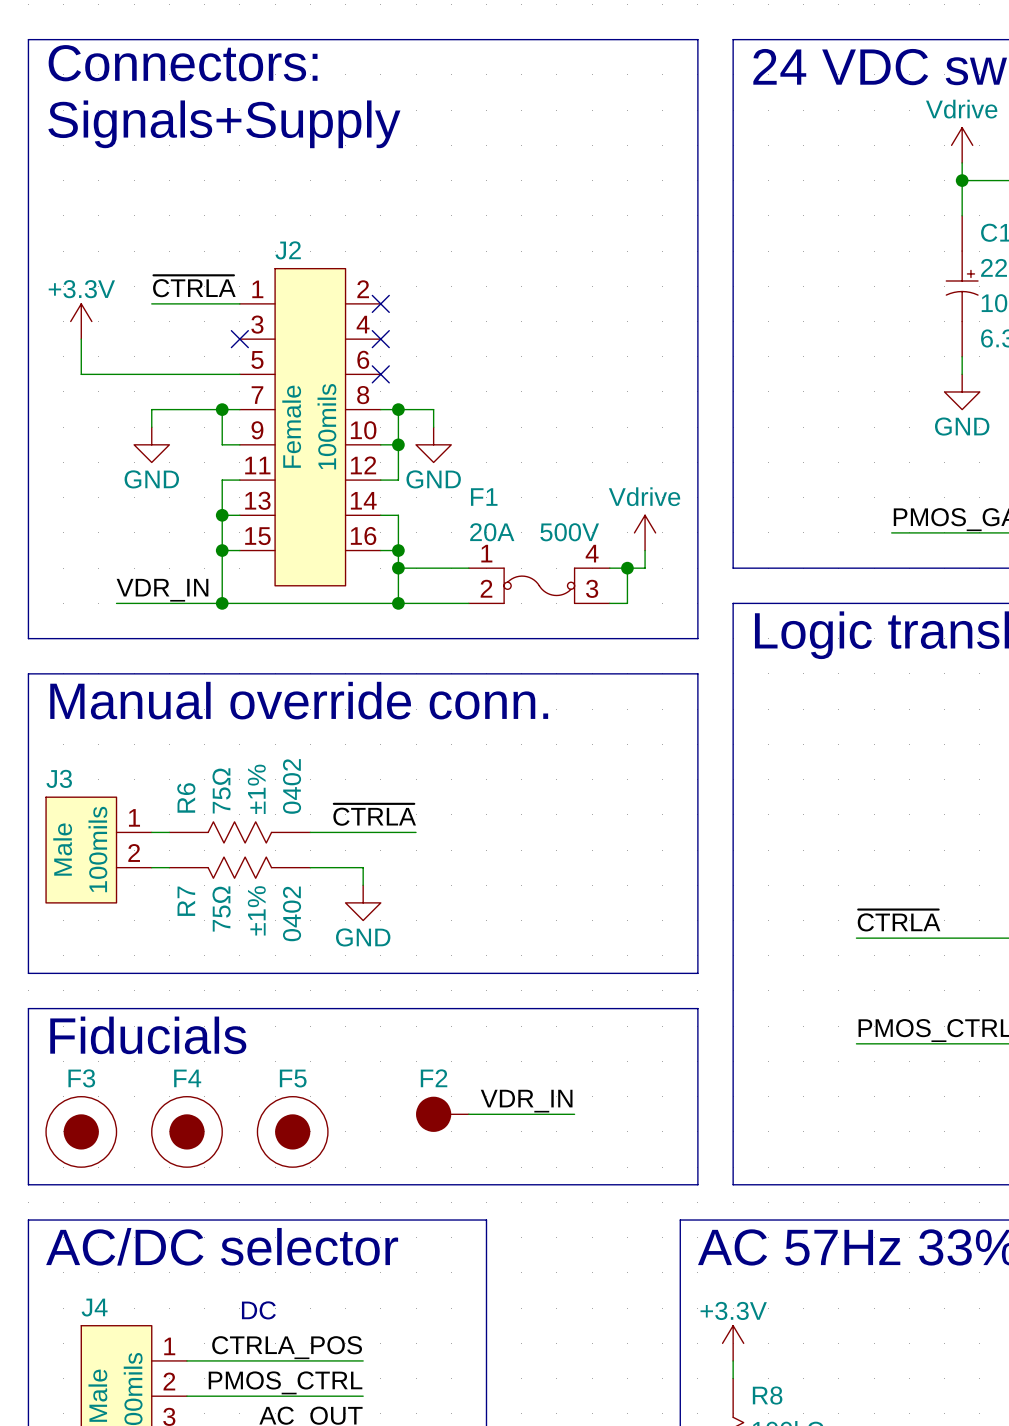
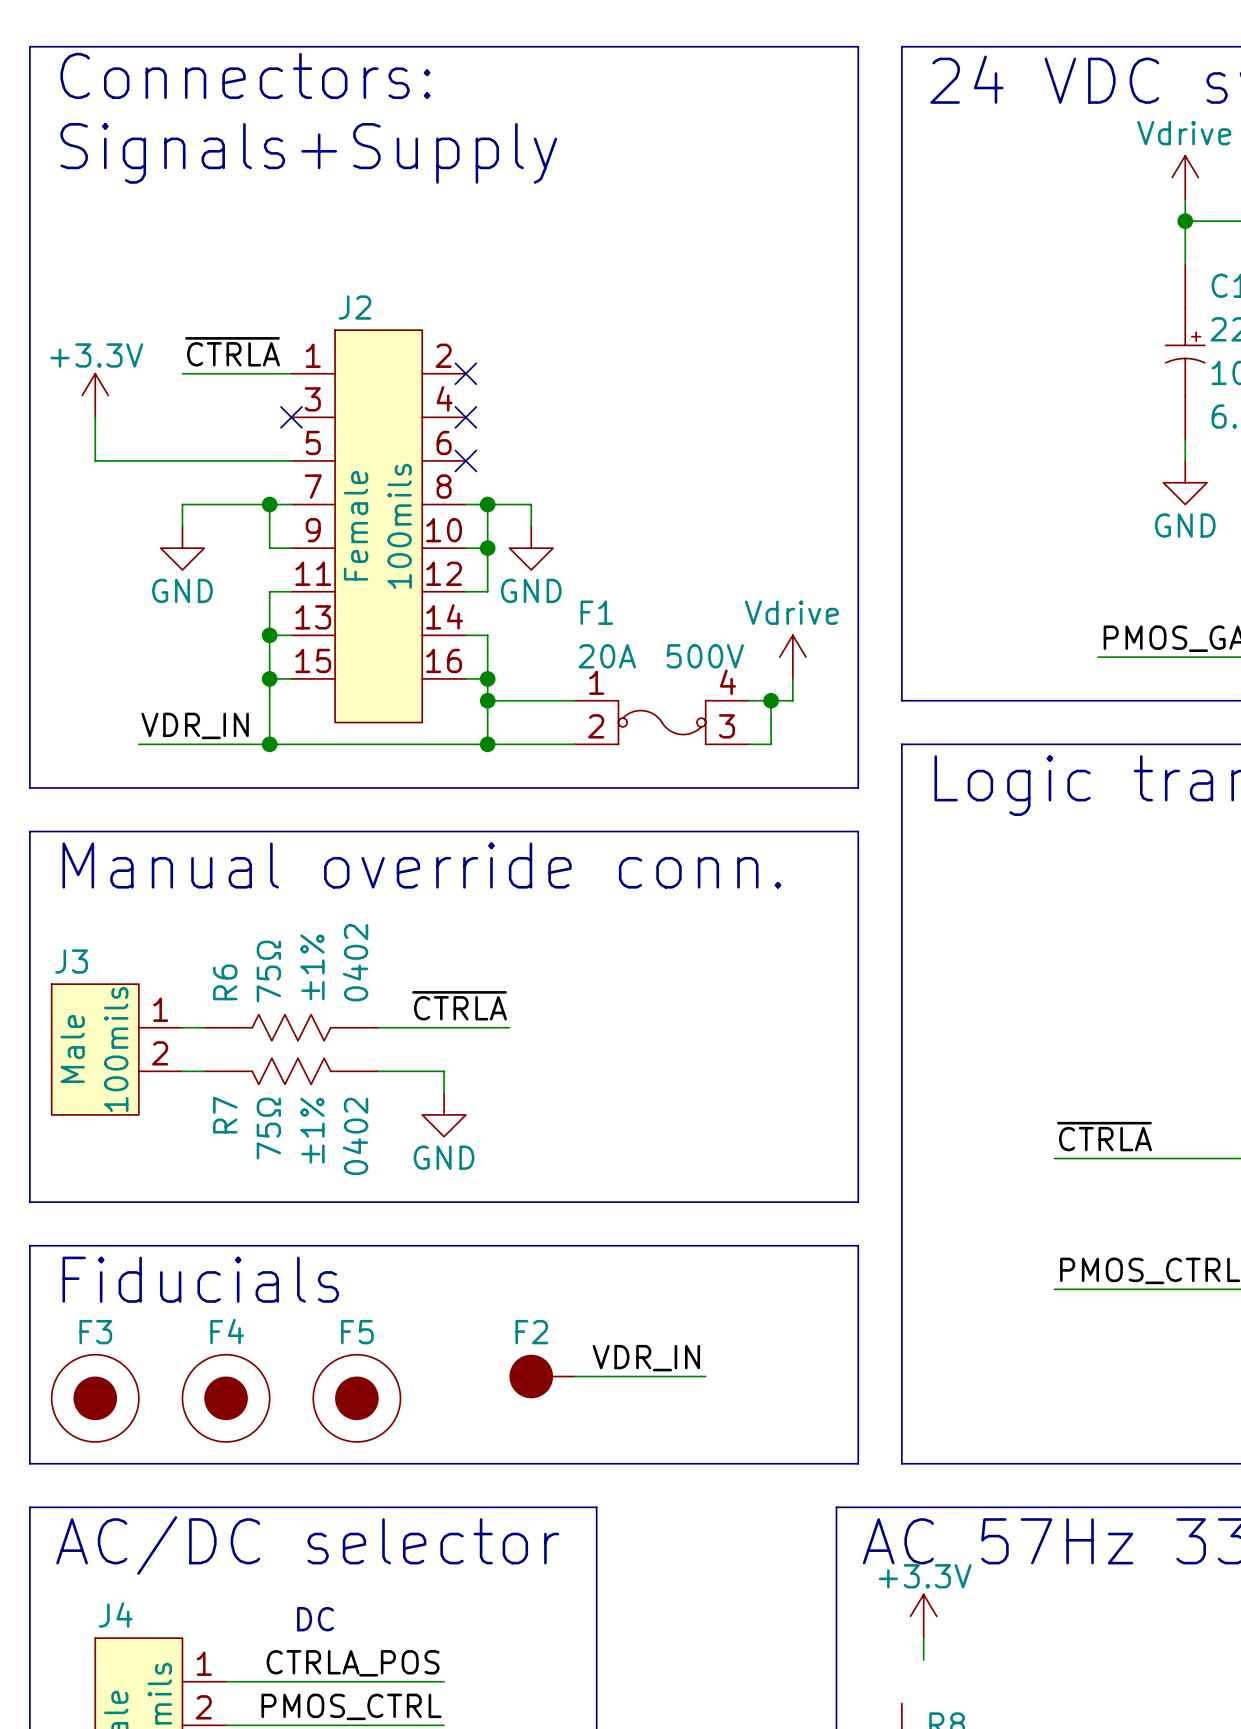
power symbol position: +3.3V (733, 1343) -> +3.3V (923, 1616)
wire: (733, 1360) (733, 1378) -> (923, 1638) (923, 1659)

